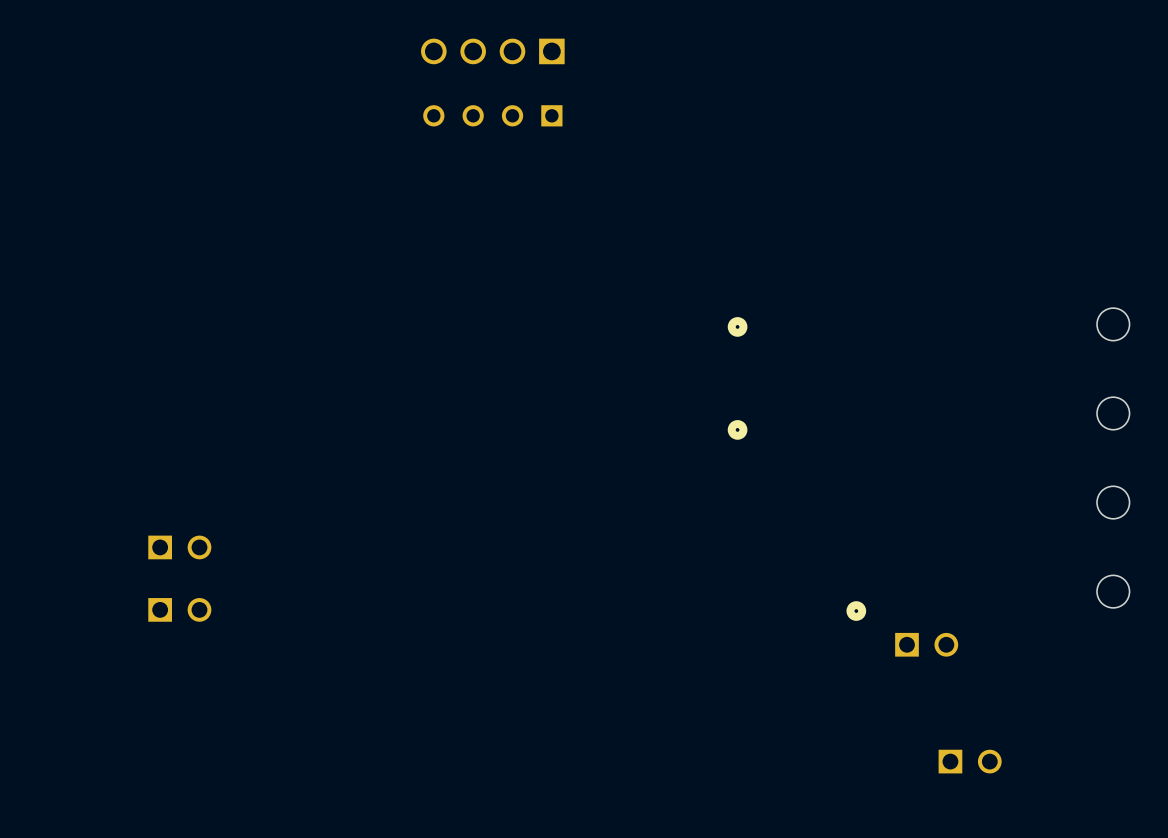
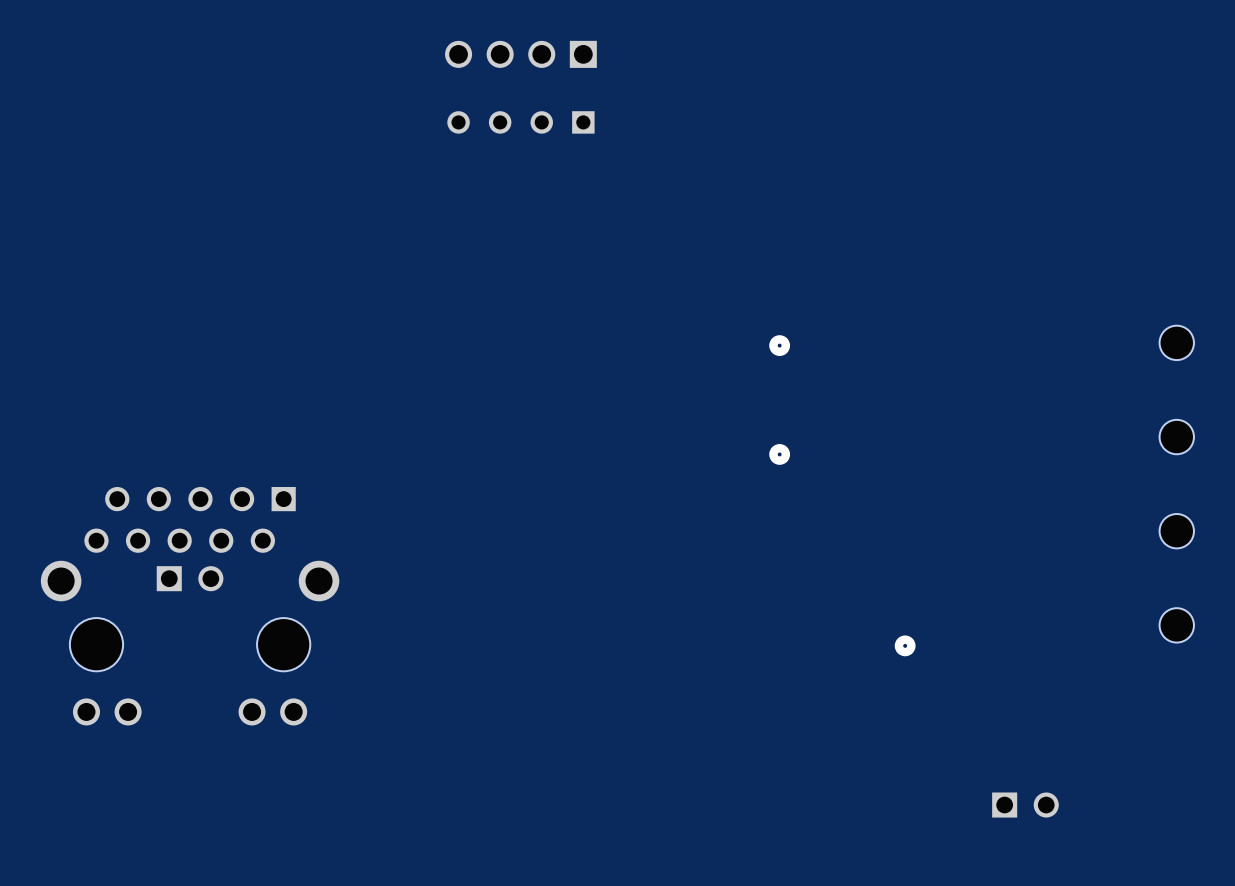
part: none -> (190, 606)
part: (179, 609) -> none
part: (926, 644) -> none

